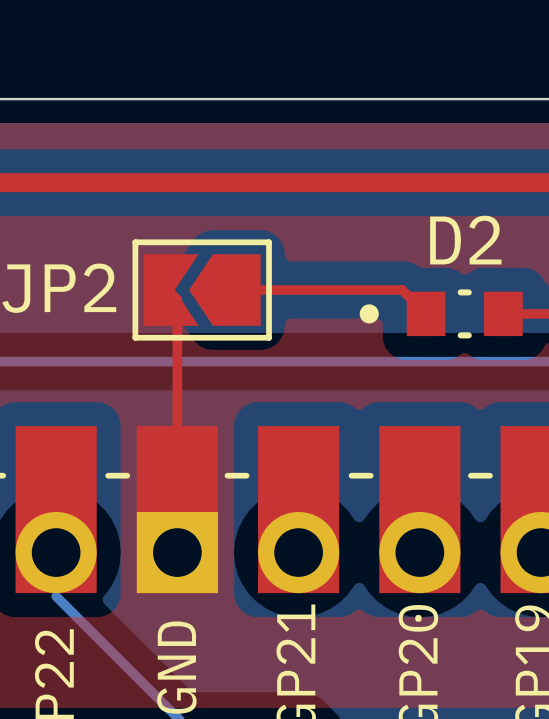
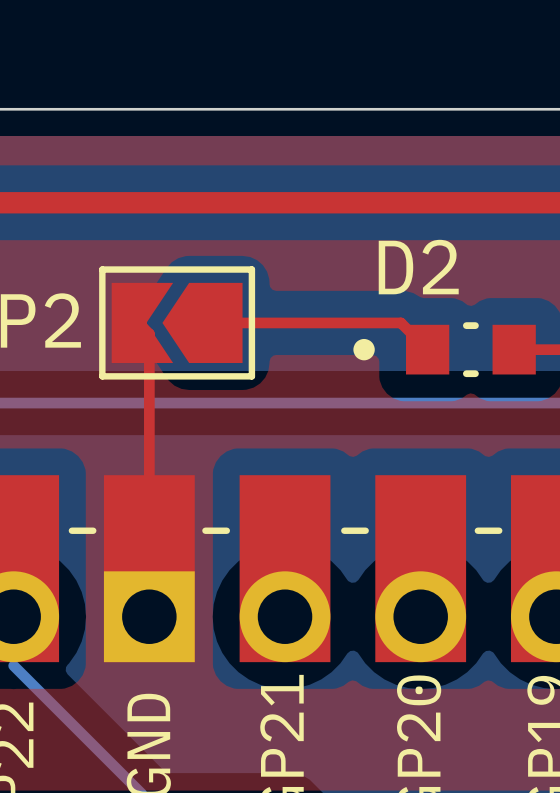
D2 name position: D2 (465, 240) -> D2 (418, 267)

